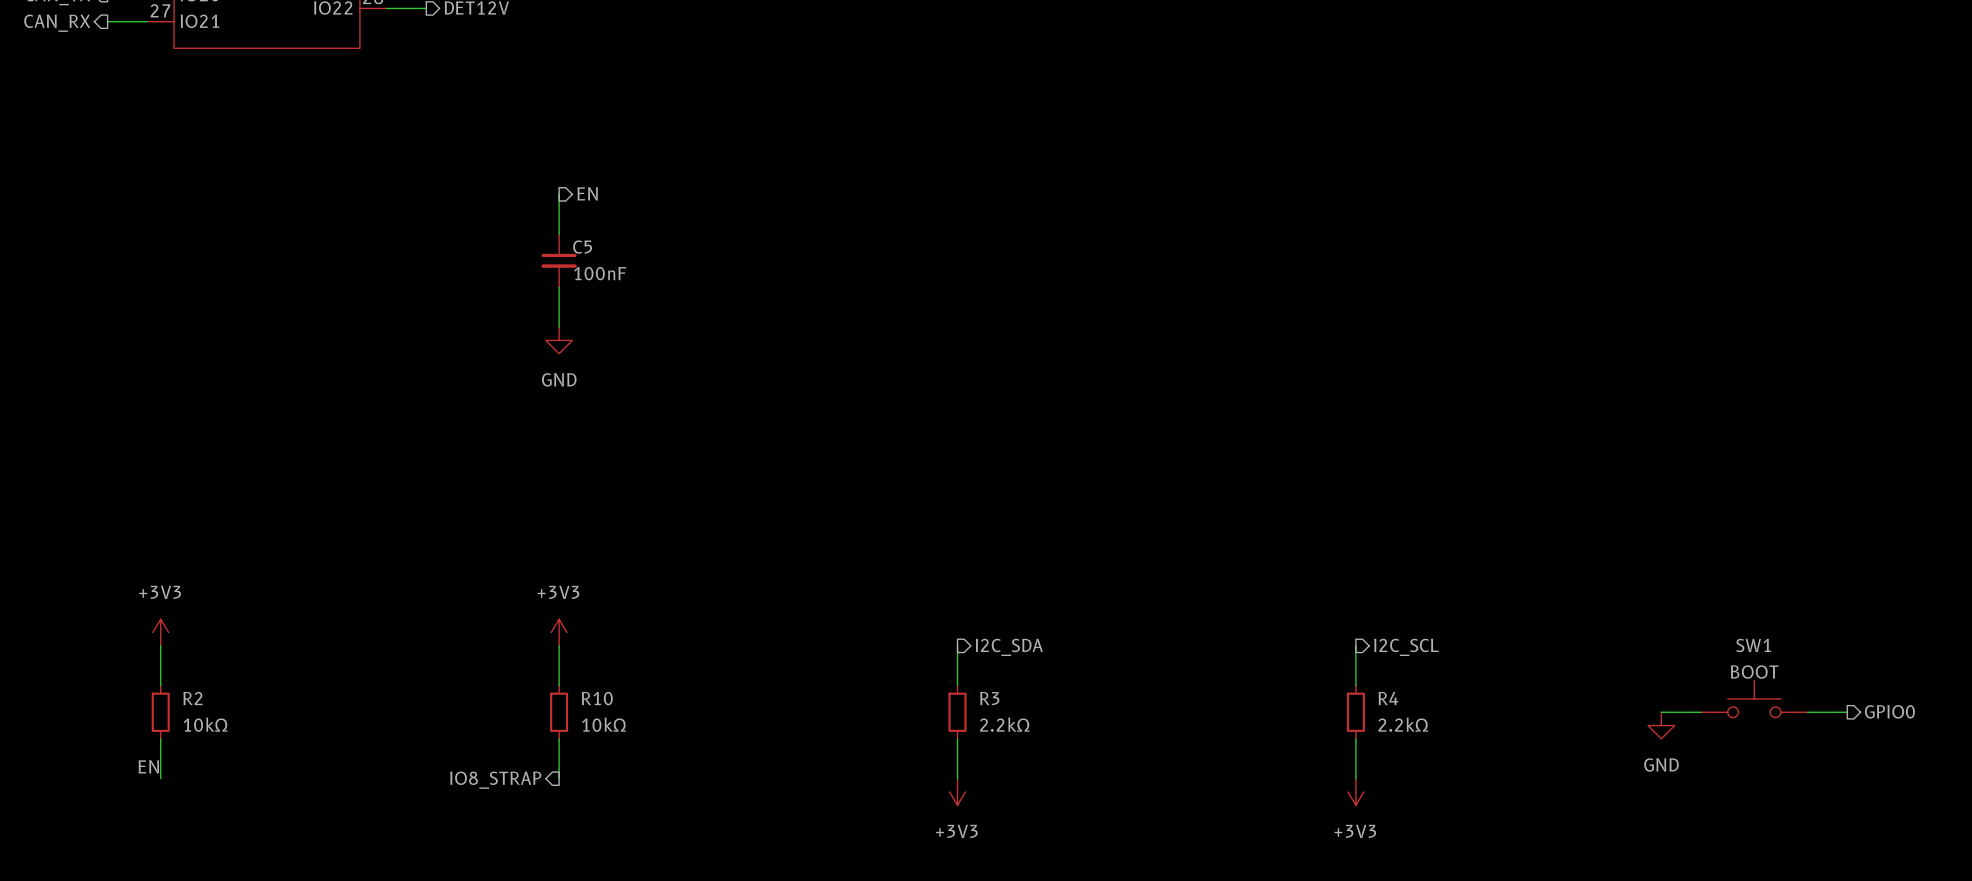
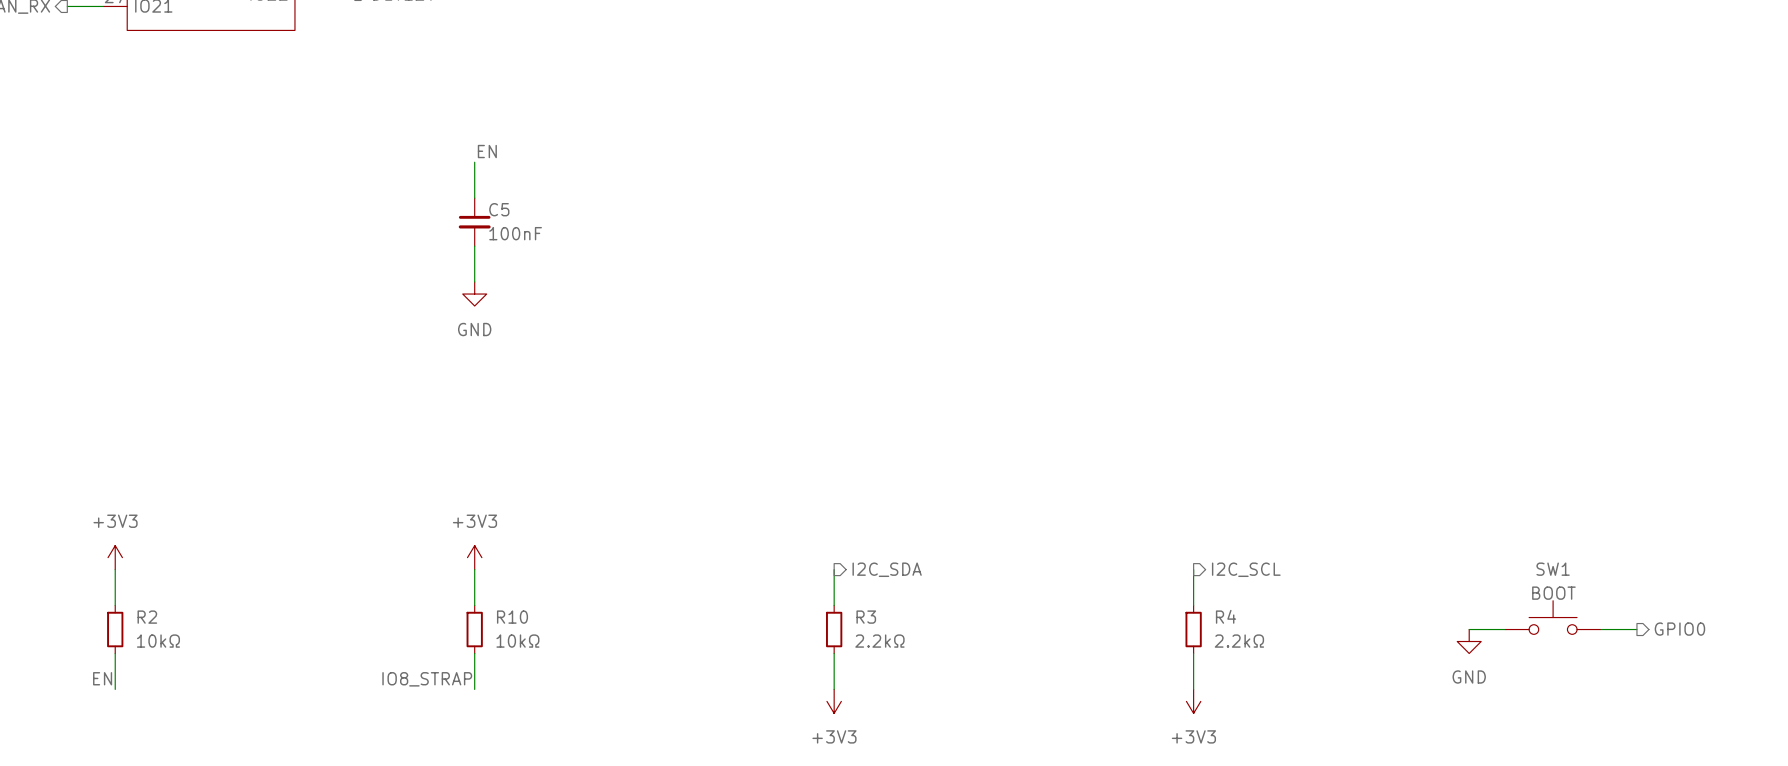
label: none -> EN (487, 151)
hierarchical label: EN (587, 193) -> none
label: none -> IO8_STRAP (427, 679)
hierarchical label: IO8_STRAP (495, 780) -> none

